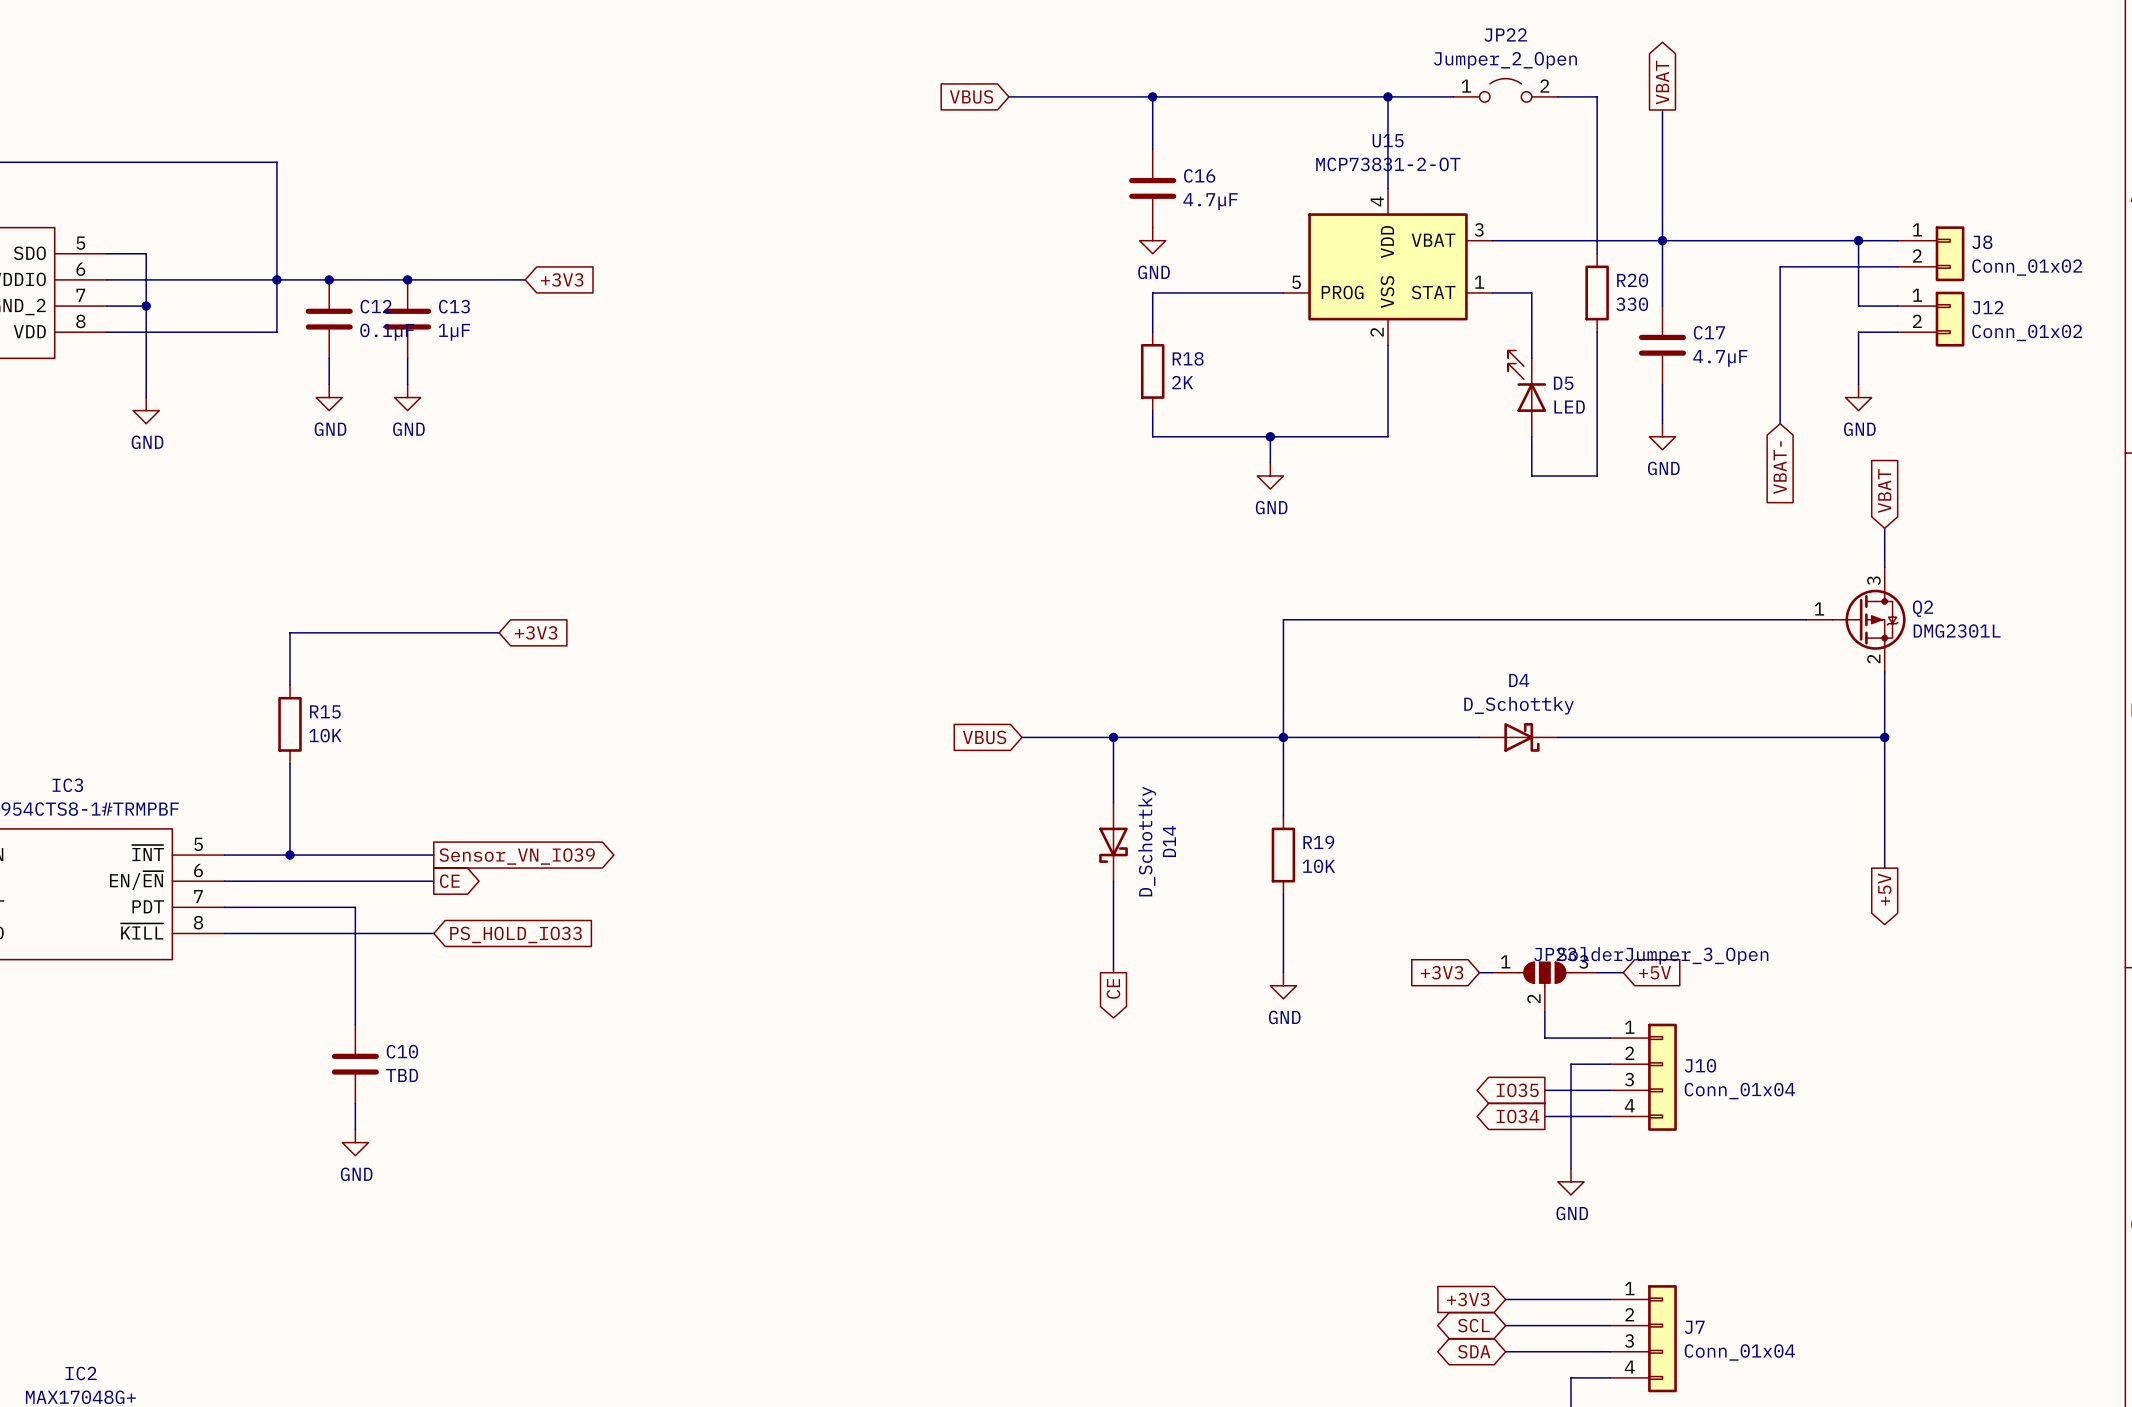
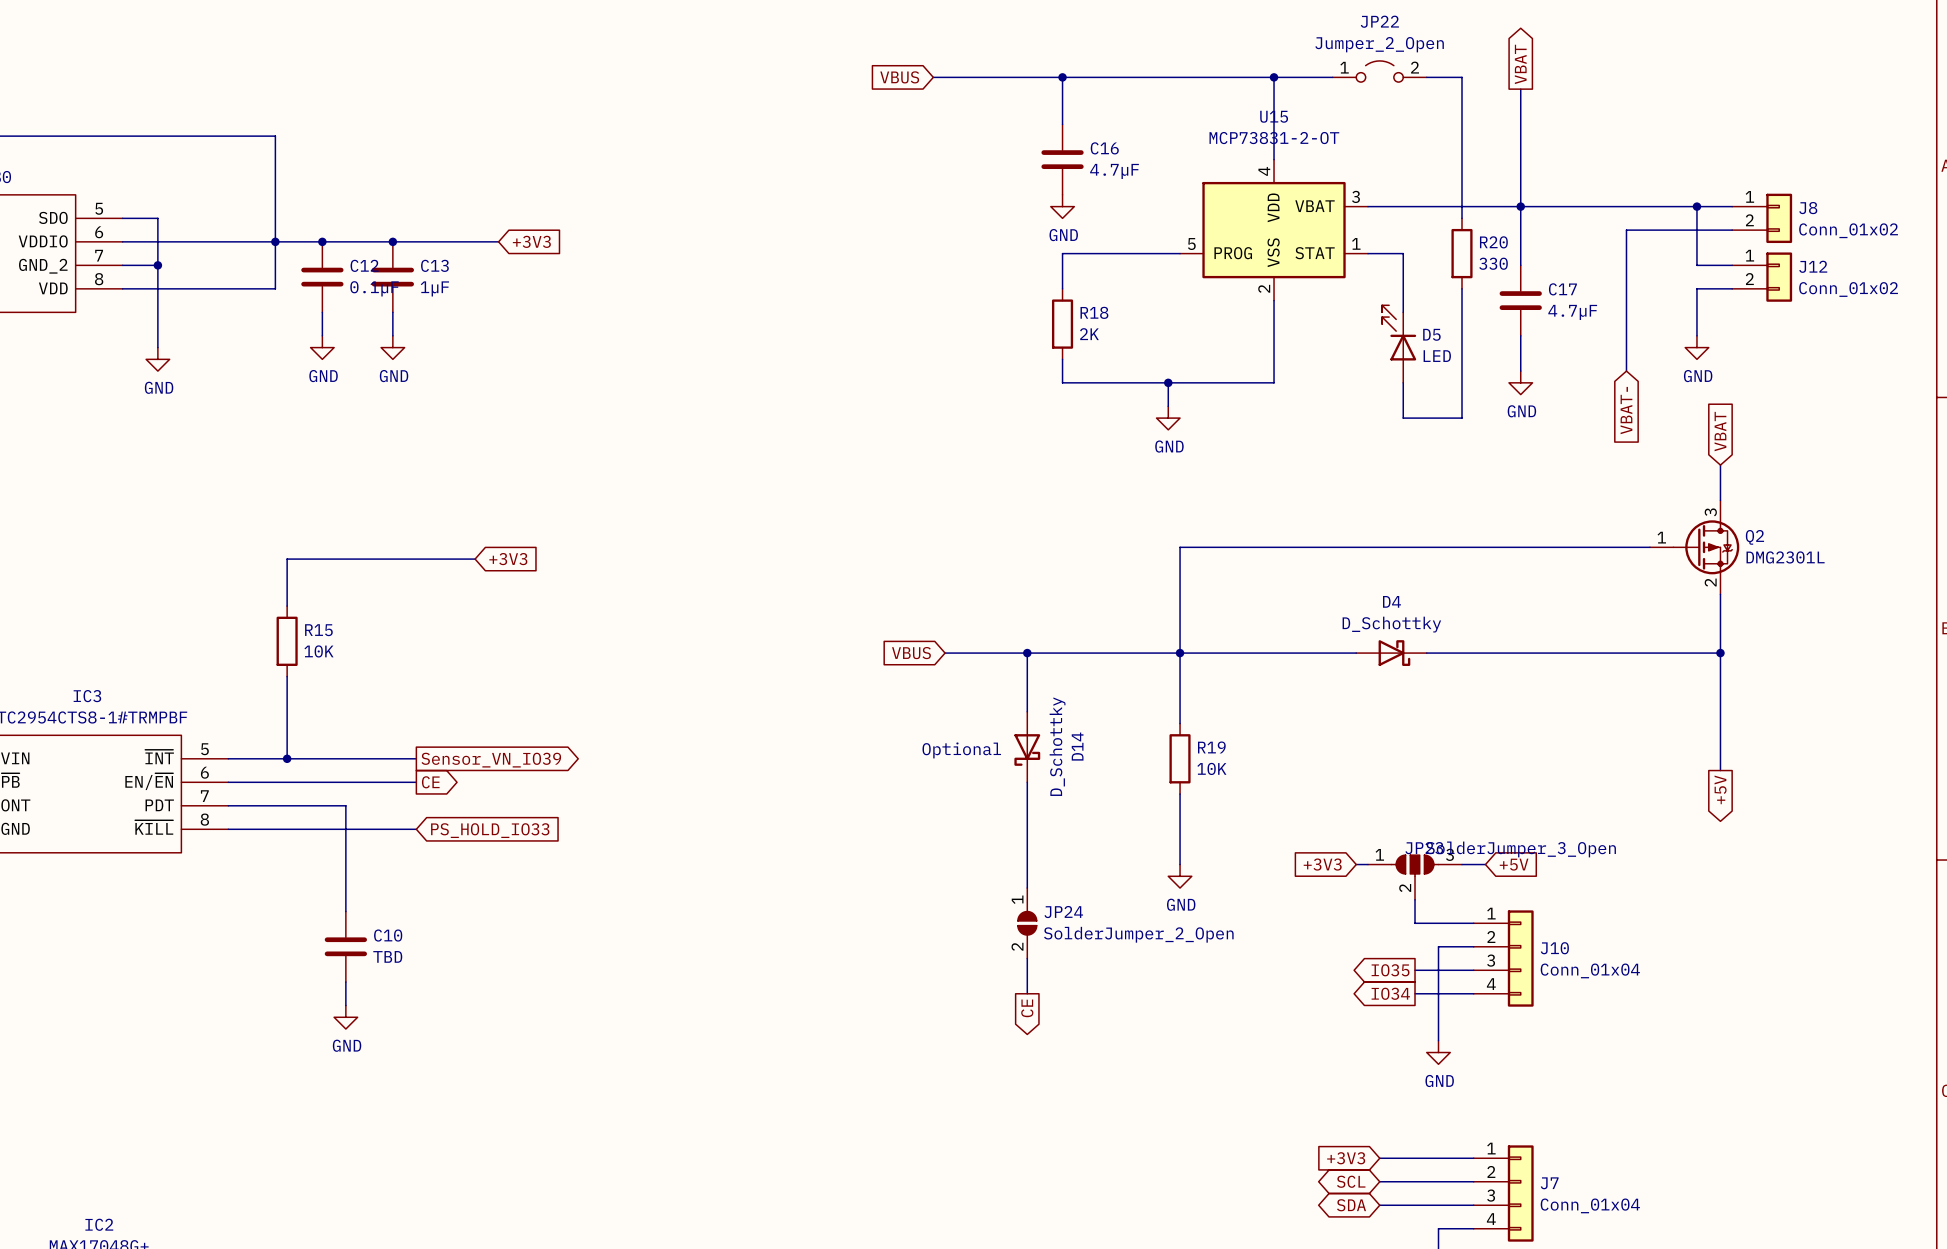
text: none -> Optional (961, 750)
wire: none -> (1027, 864) (1027, 888)
global label position: CE (1113, 988) -> CE (1027, 1008)
JP24: none -> SolderJumper_2_Open (1027, 923)
wire: none -> (1027, 958) (1027, 993)

